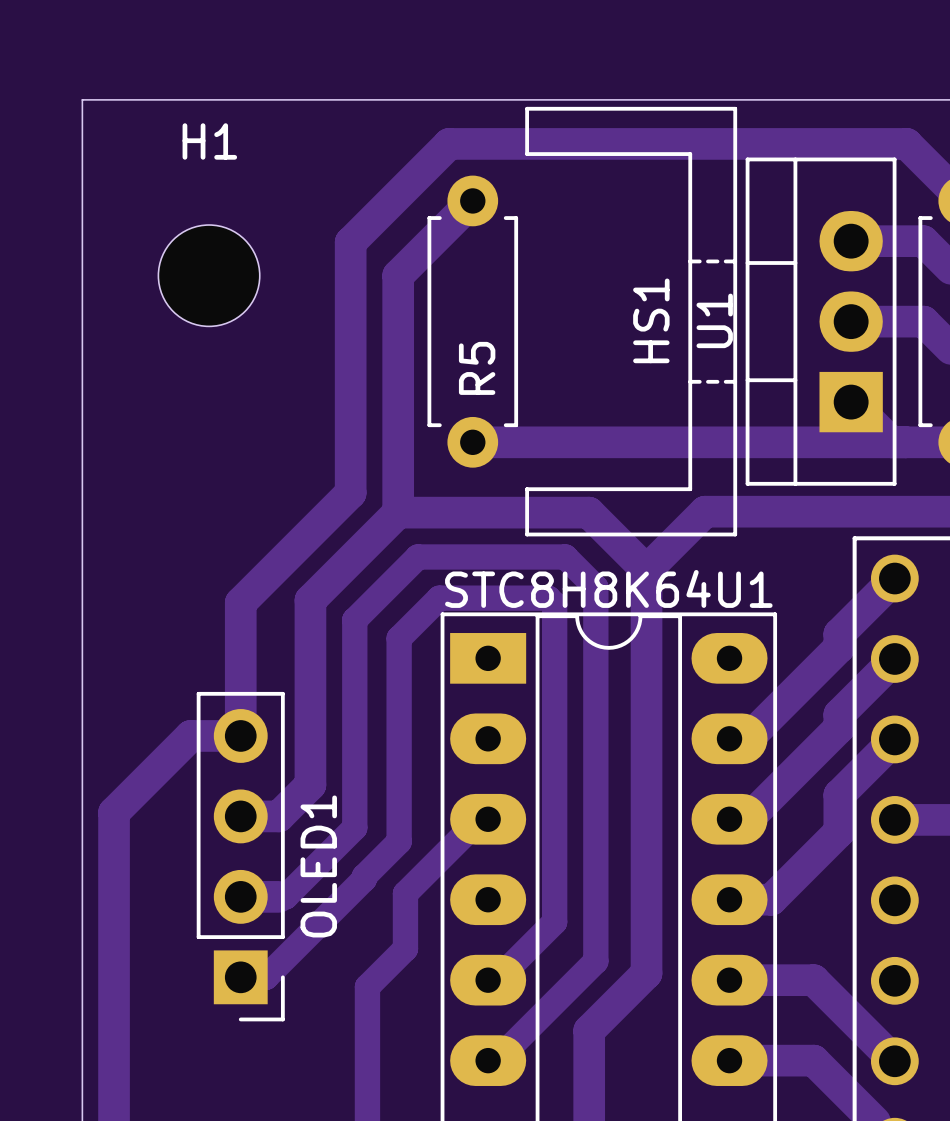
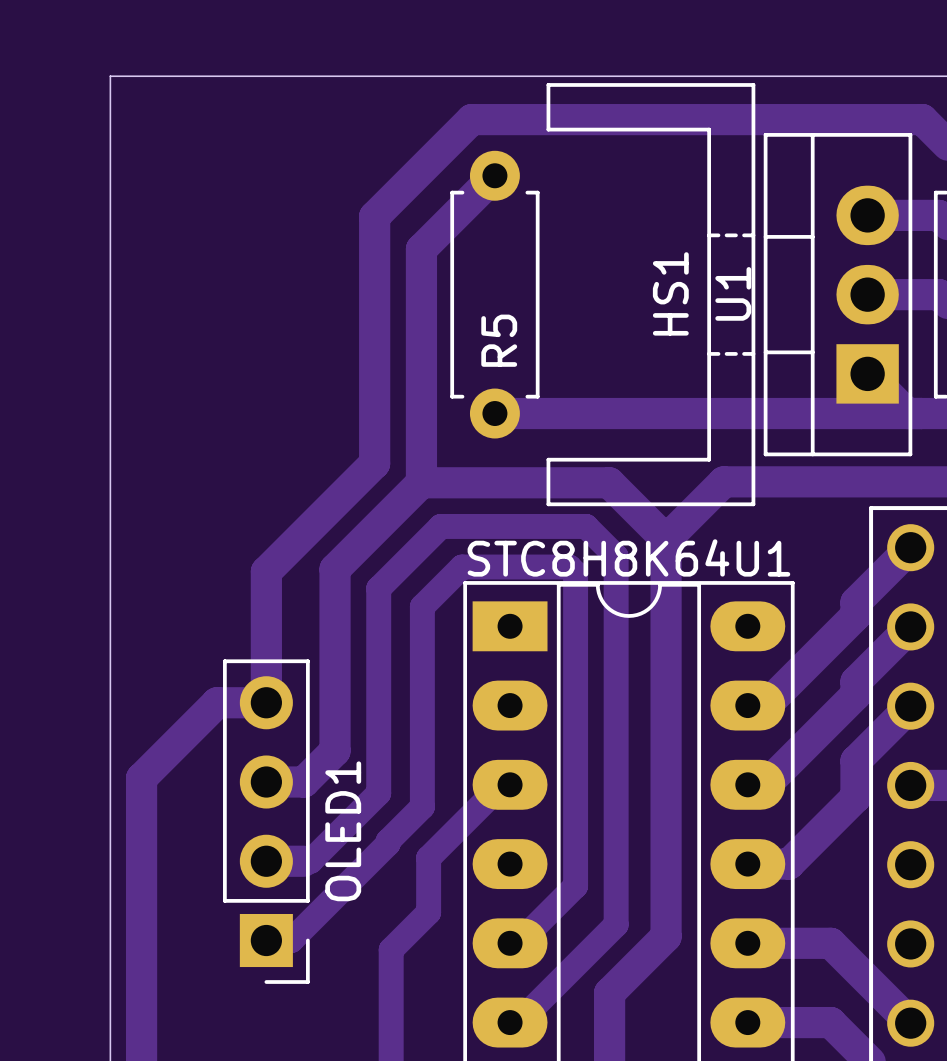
H1: (209, 275) -> none

